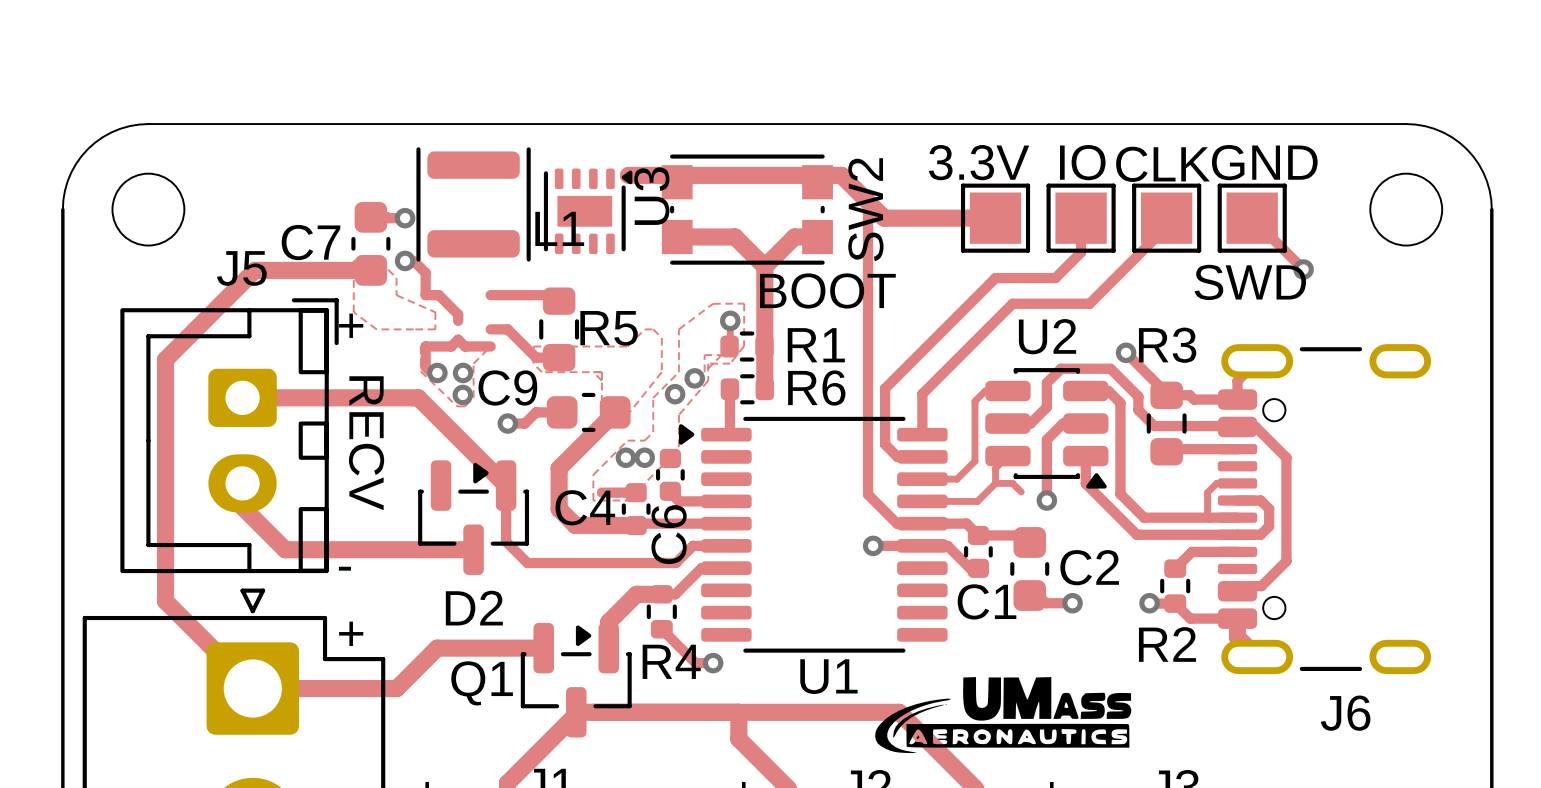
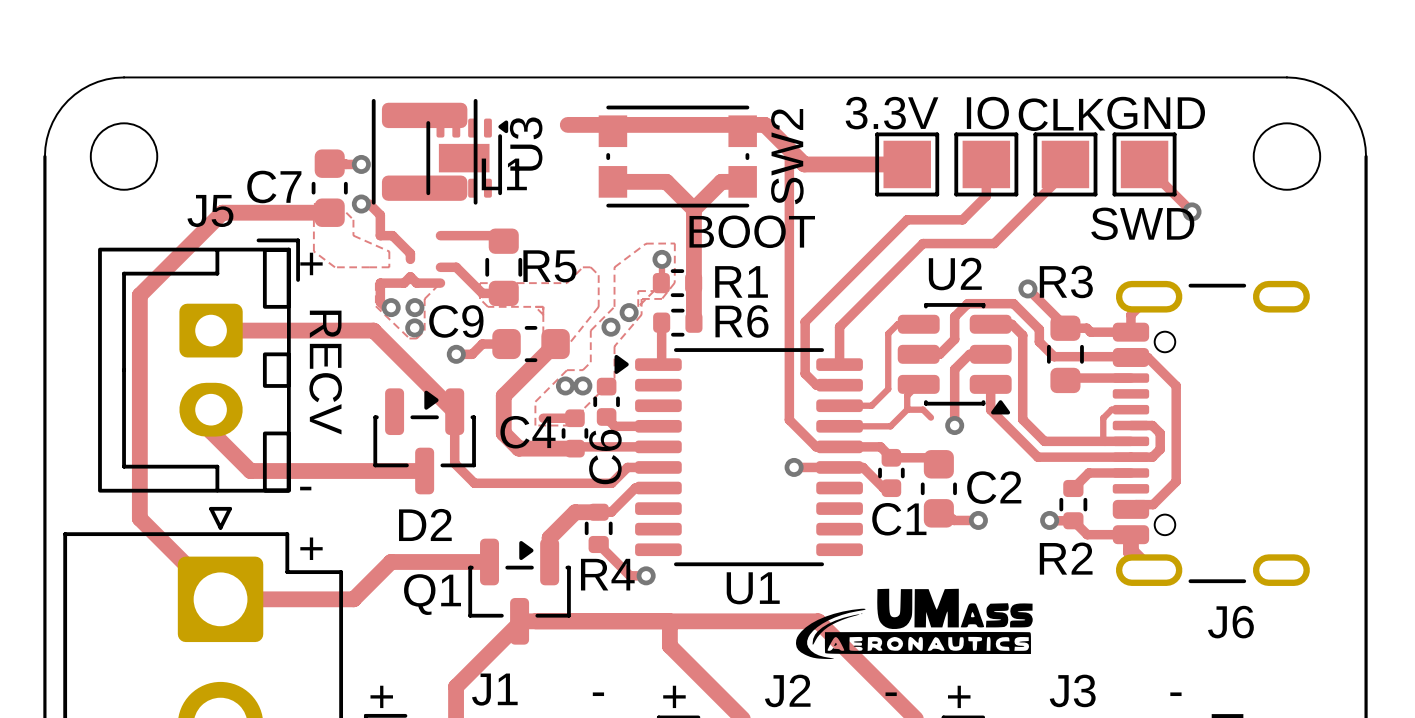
U3 position: (588, 211) -> (467, 158)

